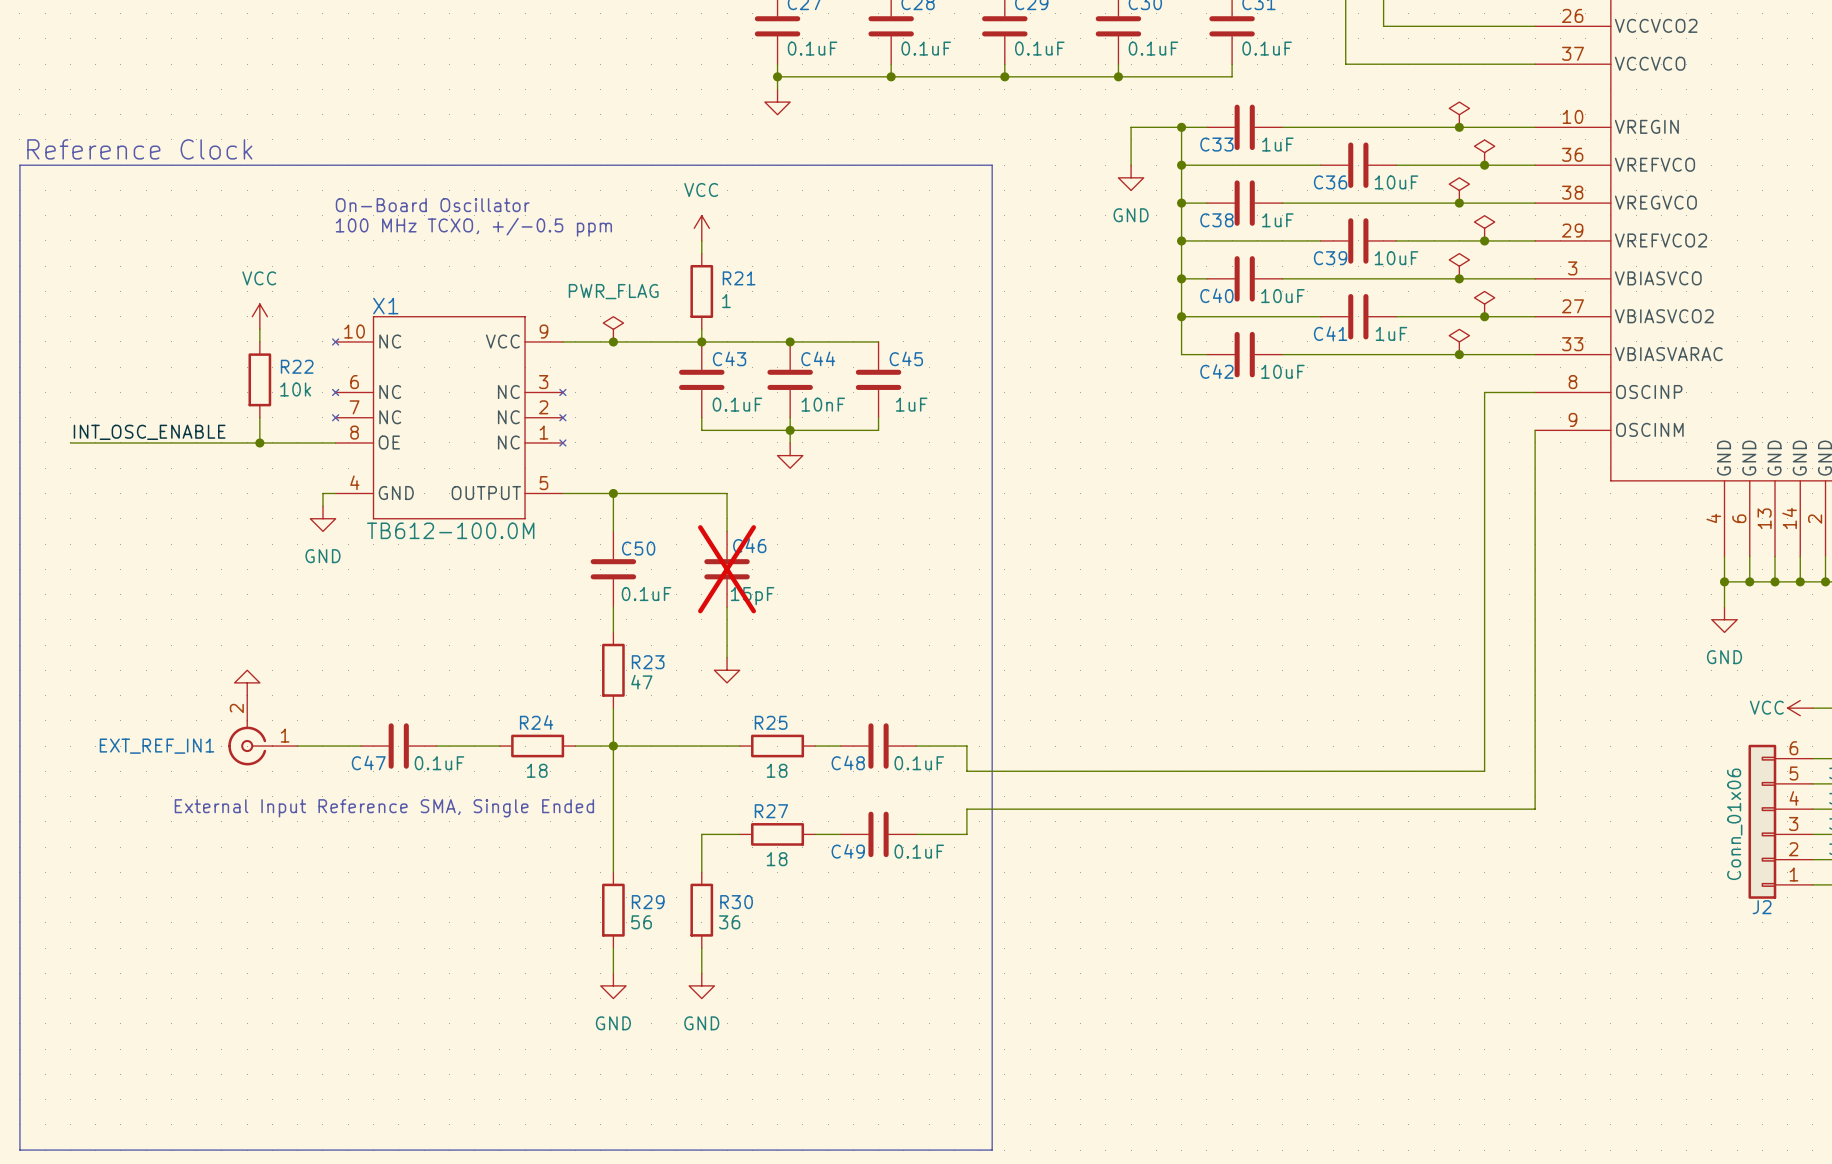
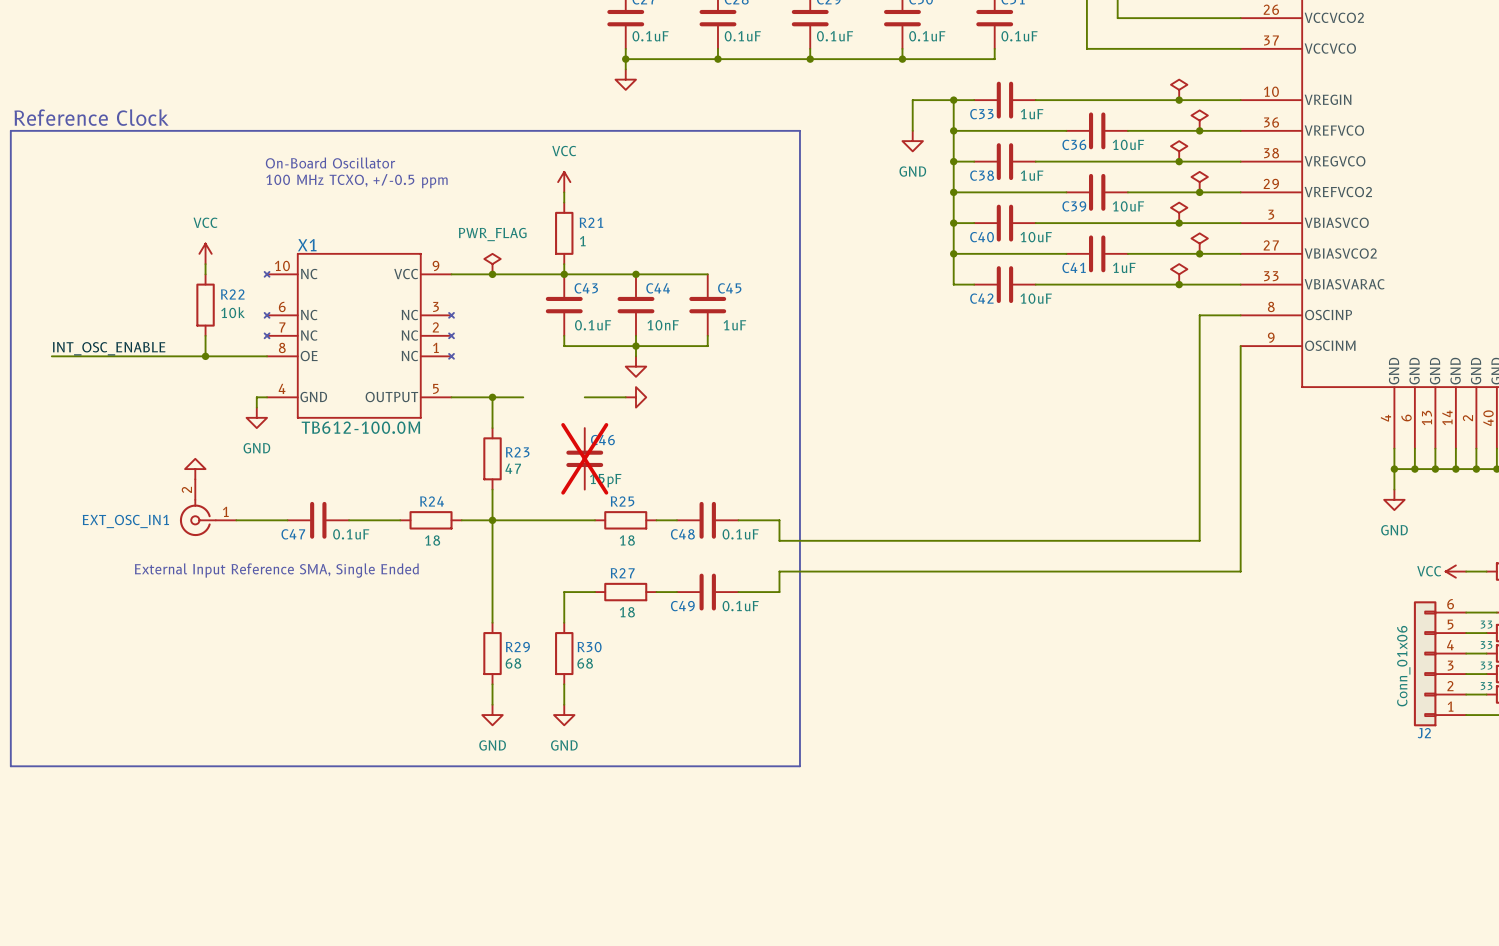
wire: (651, 493) (727, 493) (727, 531) -> none
wire: none -> (584, 397) (625, 397)
C50: 0.1uF (613, 569) -> none
wire: (727, 607) (727, 657) -> none
EXT_OSC_IN1: none -> (208, 507)
junction: none -> (492, 520)
R23 position: (613, 670) -> (492, 458)
power symbol rotation: 0° (727, 670) -> 90° counterclockwise (636, 397)
power symbol position: (727, 670) -> (636, 397)
wire: (1484, 670) (1484, 771) (966, 771) (966, 746) (916, 746) -> (1199, 540) (779, 540) (779, 520) (738, 520)
power symbol position: (247, 682) -> (195, 469)
wire: (1535, 708) (1535, 809) (966, 809) (966, 834) (916, 834) -> (1240, 571) (779, 571) (779, 592) (738, 592)
EXT_REF_IN1: (263, 730) -> none
wire: none -> (595, 592) (564, 592) (564, 622)
wire: (297, 746) (360, 746) -> (236, 520) (287, 520)
C47 position: (398, 746) -> (318, 520)
wire: (436, 746) (499, 746) -> (349, 520) (400, 520)
R24 position: (537, 746) -> (431, 520)
wire: (575, 746) (739, 746) -> (461, 520) (595, 520)
junction: (613, 746) -> none
R25 position: (777, 746) -> (625, 520)
wire: (815, 746) (840, 746) -> (656, 520) (676, 520)
C48 position: (878, 746) -> (707, 520)
wire: (613, 771) (613, 847) -> (492, 510) (492, 571)
text position: External Input Reference SMA, Single Ended (384, 808) -> External Input Reference SMA, Single Ended (276, 570)
wire: (739, 834) (701, 834) (701, 847) -> none
R27 position: (777, 834) -> (625, 592)
wire: (815, 834) (840, 834) -> (656, 592) (676, 592)
C49 position: (878, 834) -> (707, 592)
power symbol: none -> GND (492, 715)
power symbol: none -> GND (564, 715)
R29 position: (613, 910) -> (492, 653)
R30 position: (701, 910) -> (564, 653)
R29 value: 56 (641, 922) -> 68 (513, 663)
R30 value: 36 (729, 922) -> 68 (585, 663)
line: (19, 948) (19, 1150) (992, 1150) (992, 948) -> (10, 766) (799, 766)
wire: (613, 948) (613, 973) -> none
wire: (701, 948) (701, 973) -> none
power symbol: GND (613, 985) -> none
power symbol: GND (701, 985) -> none

